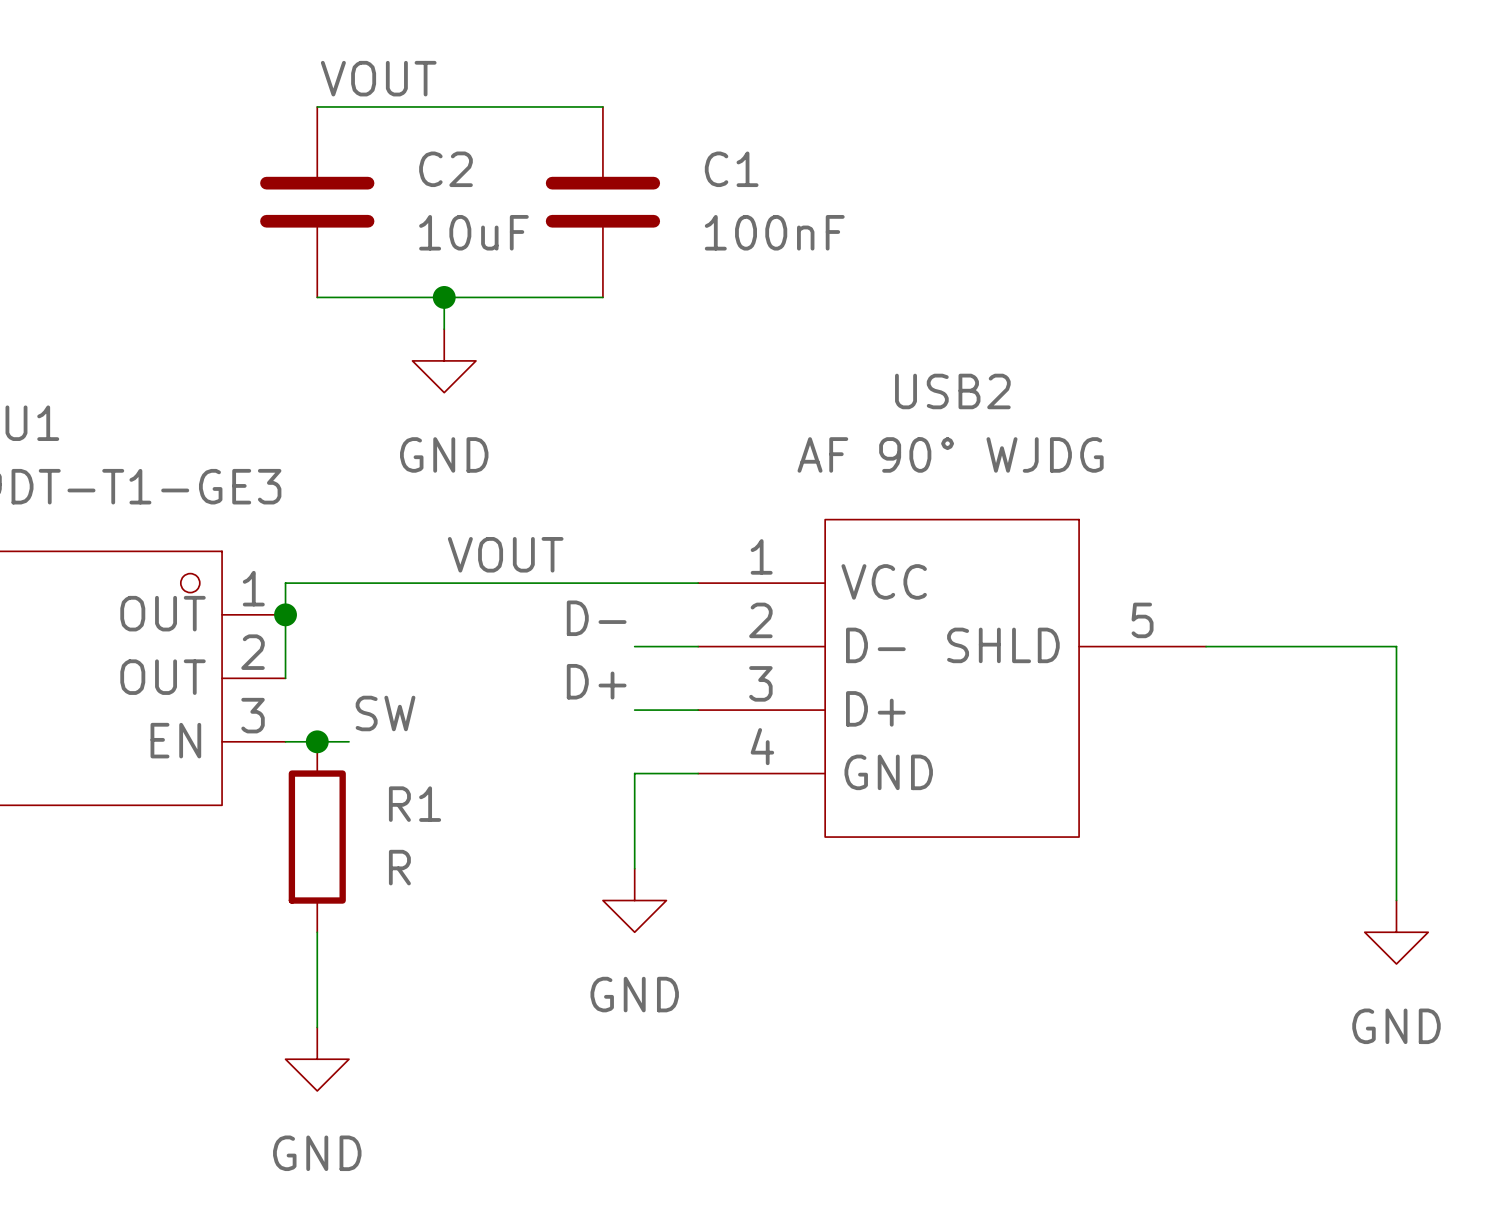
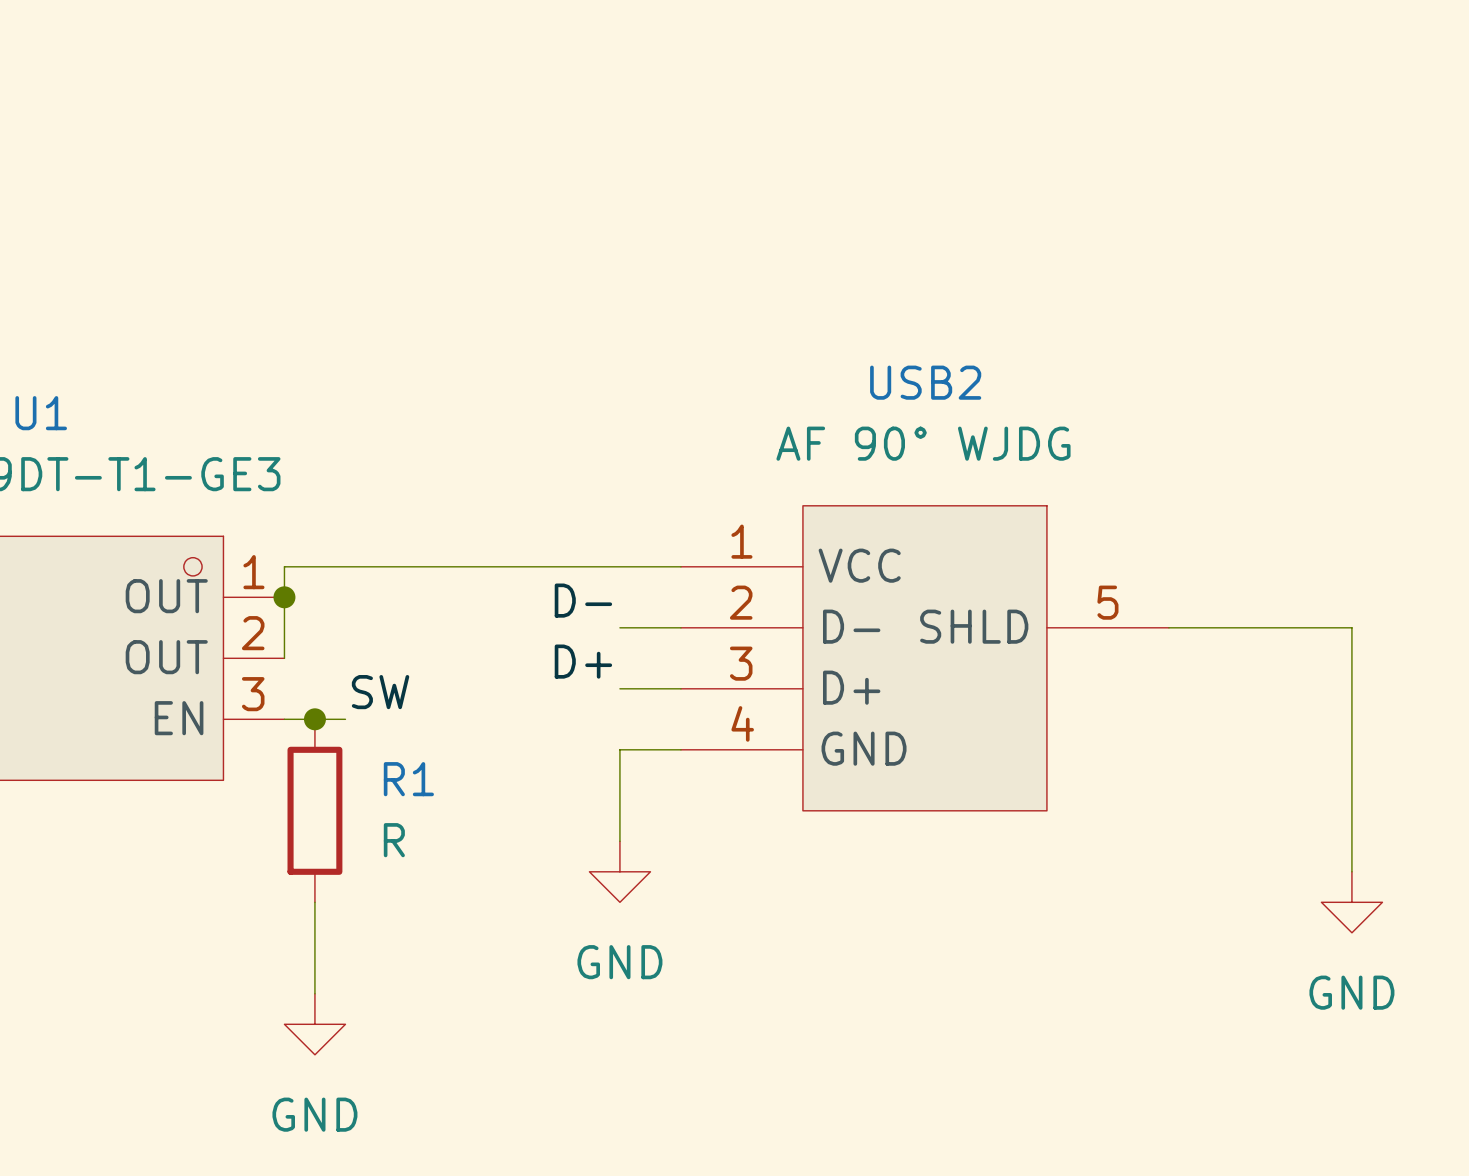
label: VOUT (378, 78) -> none
wire: (317, 106) (602, 106) -> none
C2: 10uF (317, 202) -> none
C1: 100nF (602, 202) -> none
wire: (317, 297) (602, 297) -> none
wire: (444, 297) (444, 329) -> none
junction: (444, 297) -> none
power symbol: GND (444, 360) -> none
label: VOUT (505, 554) -> none

